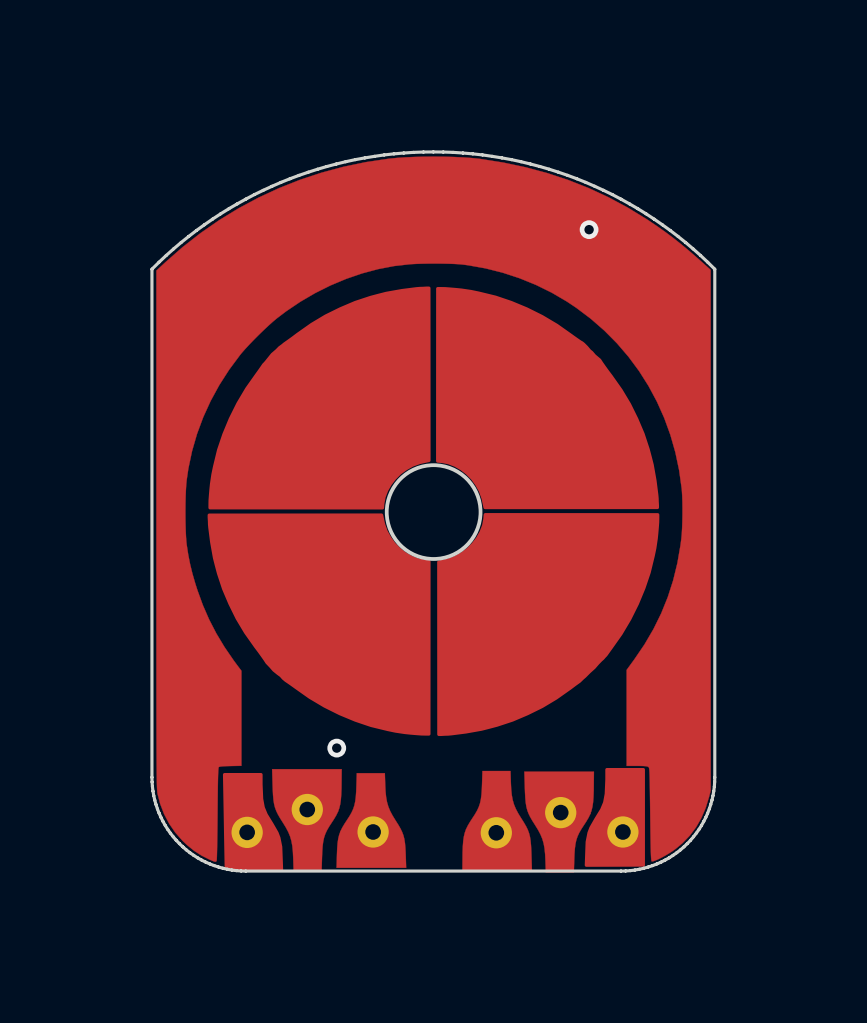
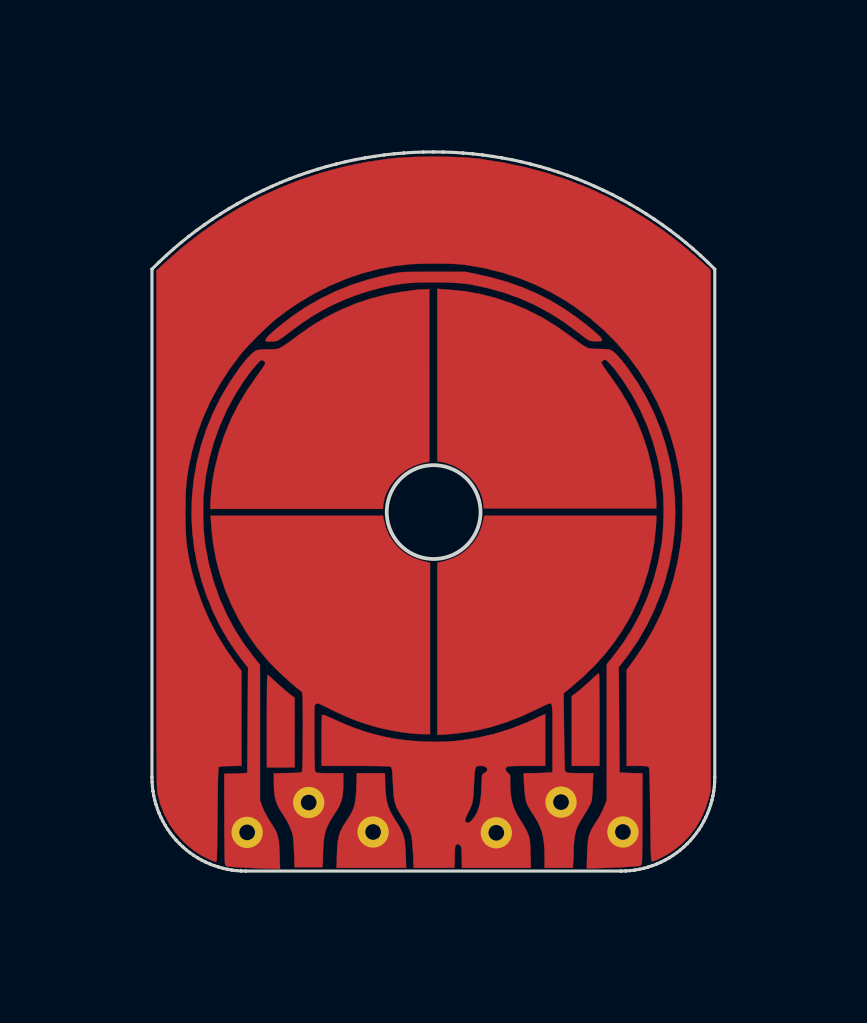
part footprint: [150, 150, 717, 873] -> [150, 150, 717, 873]
via: (589, 229) -> none
via: (336, 748) -> none

